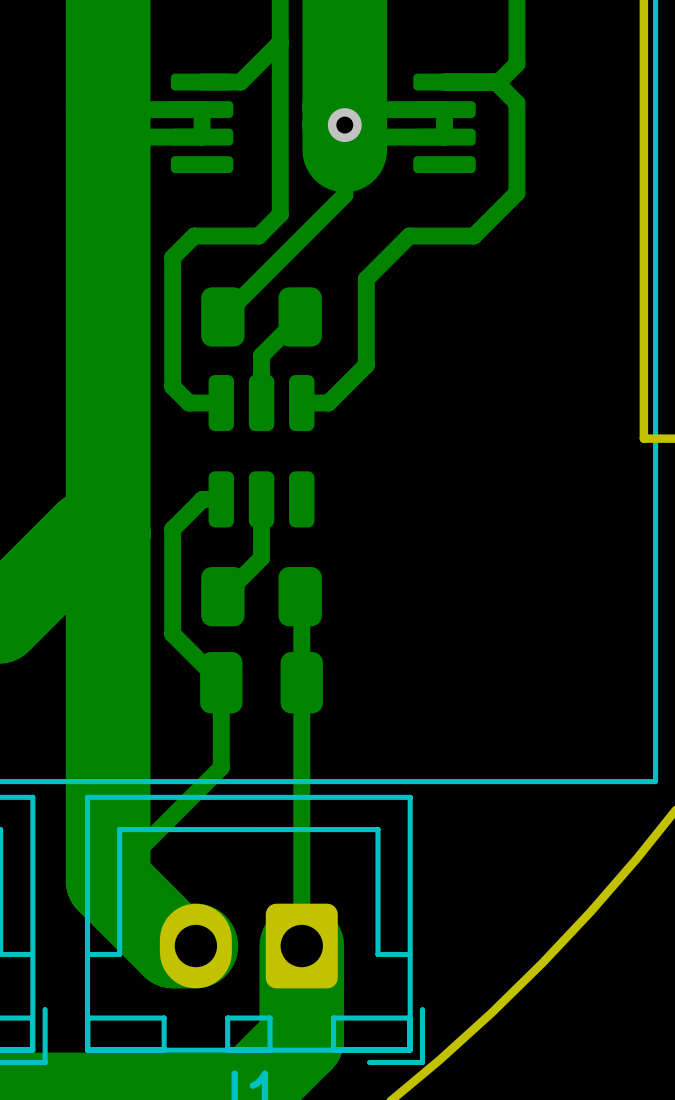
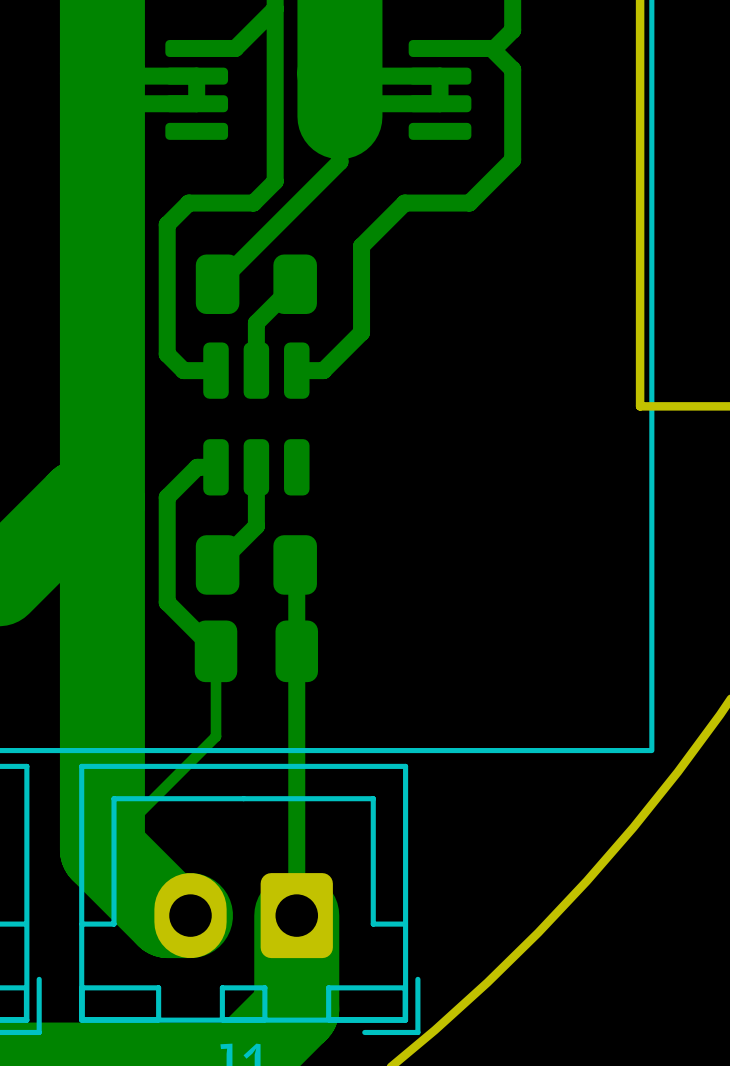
via: (344, 125) -> none
bottom track width: thick (221, 682) (221, 767) (108, 880) -> thin (216, 651) (216, 736) (102, 850)

